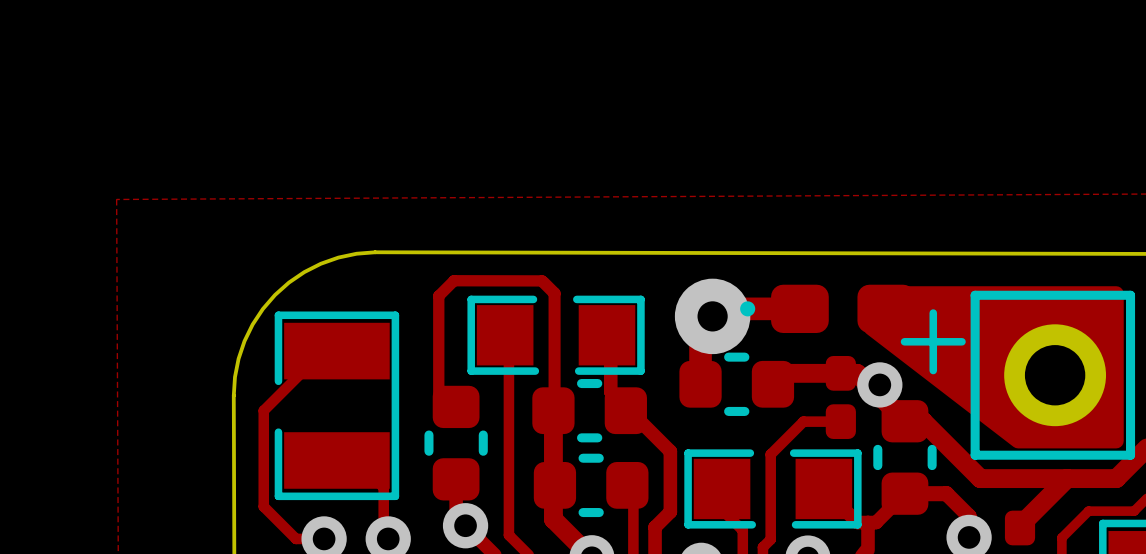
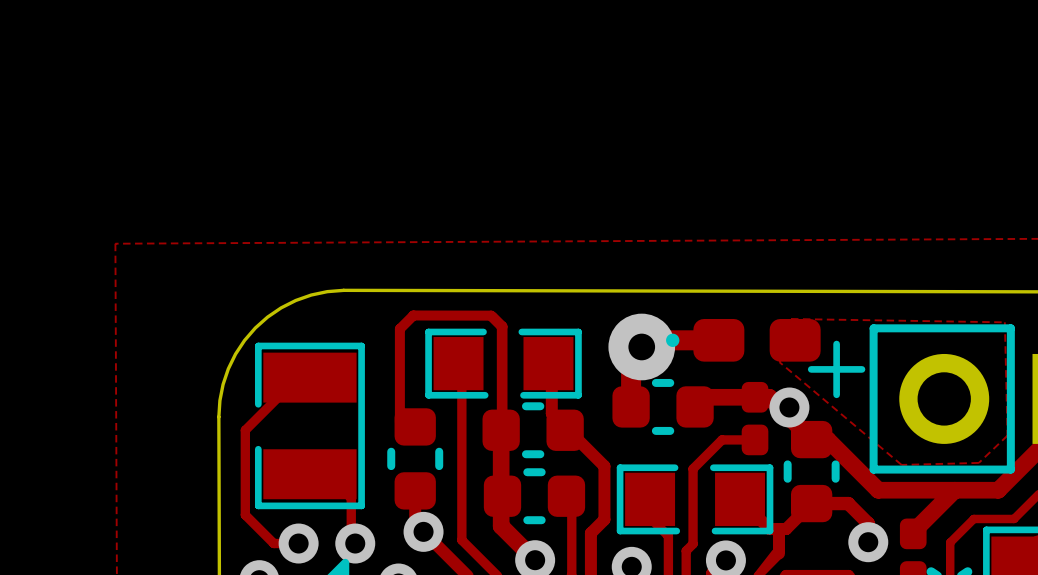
zone outline: none -> (790, 318) (1004, 322) (1007, 435) (978, 462) (901, 464) (779, 362) (790, 318)
drawing: [863, 286, 1124, 449] -> none

